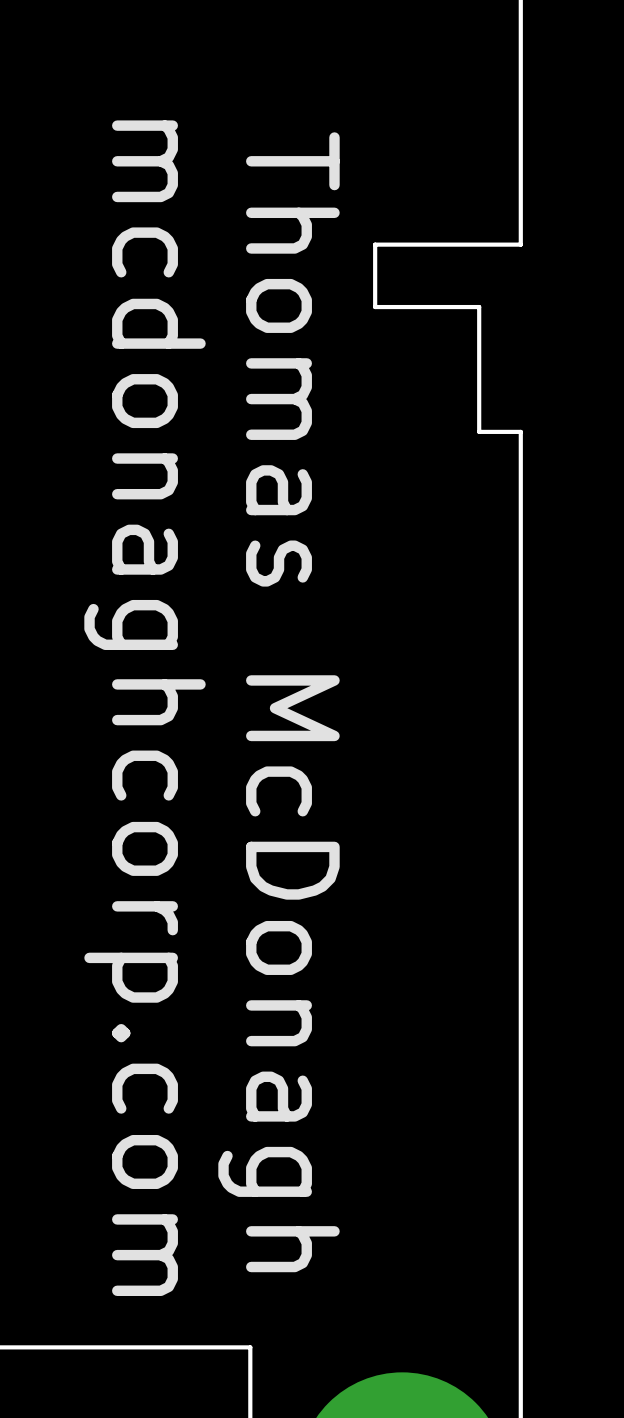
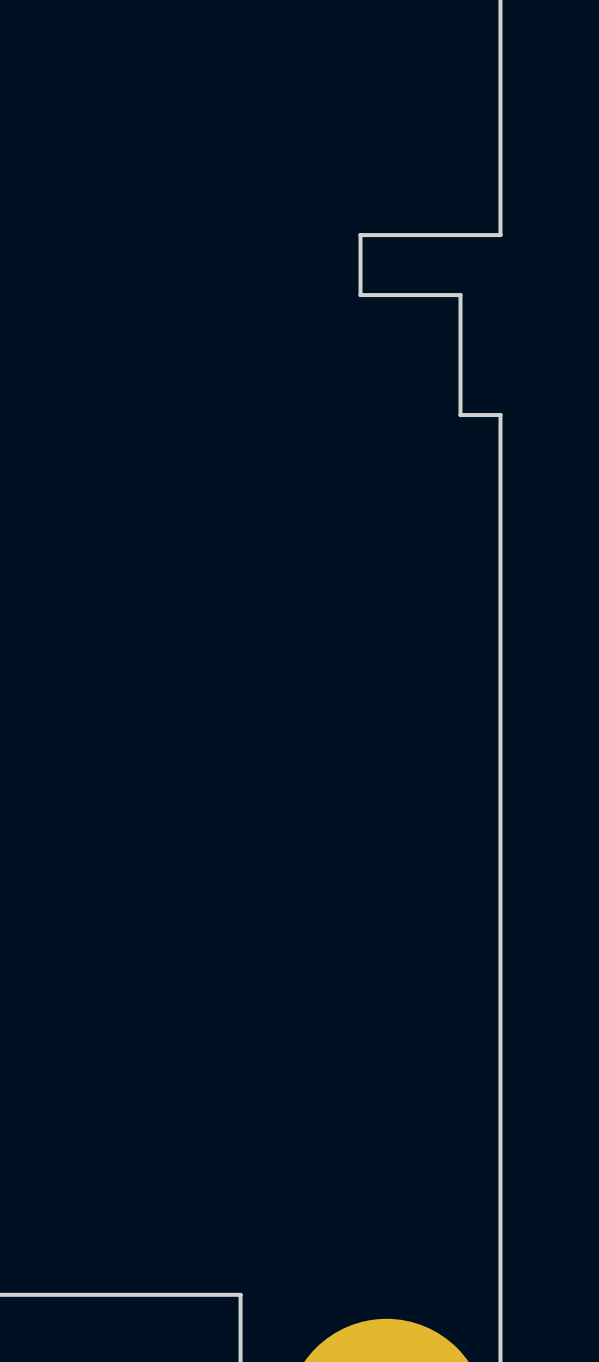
text: Thomas McDonagh (279, 702) -> none
text: mcdonaghcorp.com (145, 708) -> none

